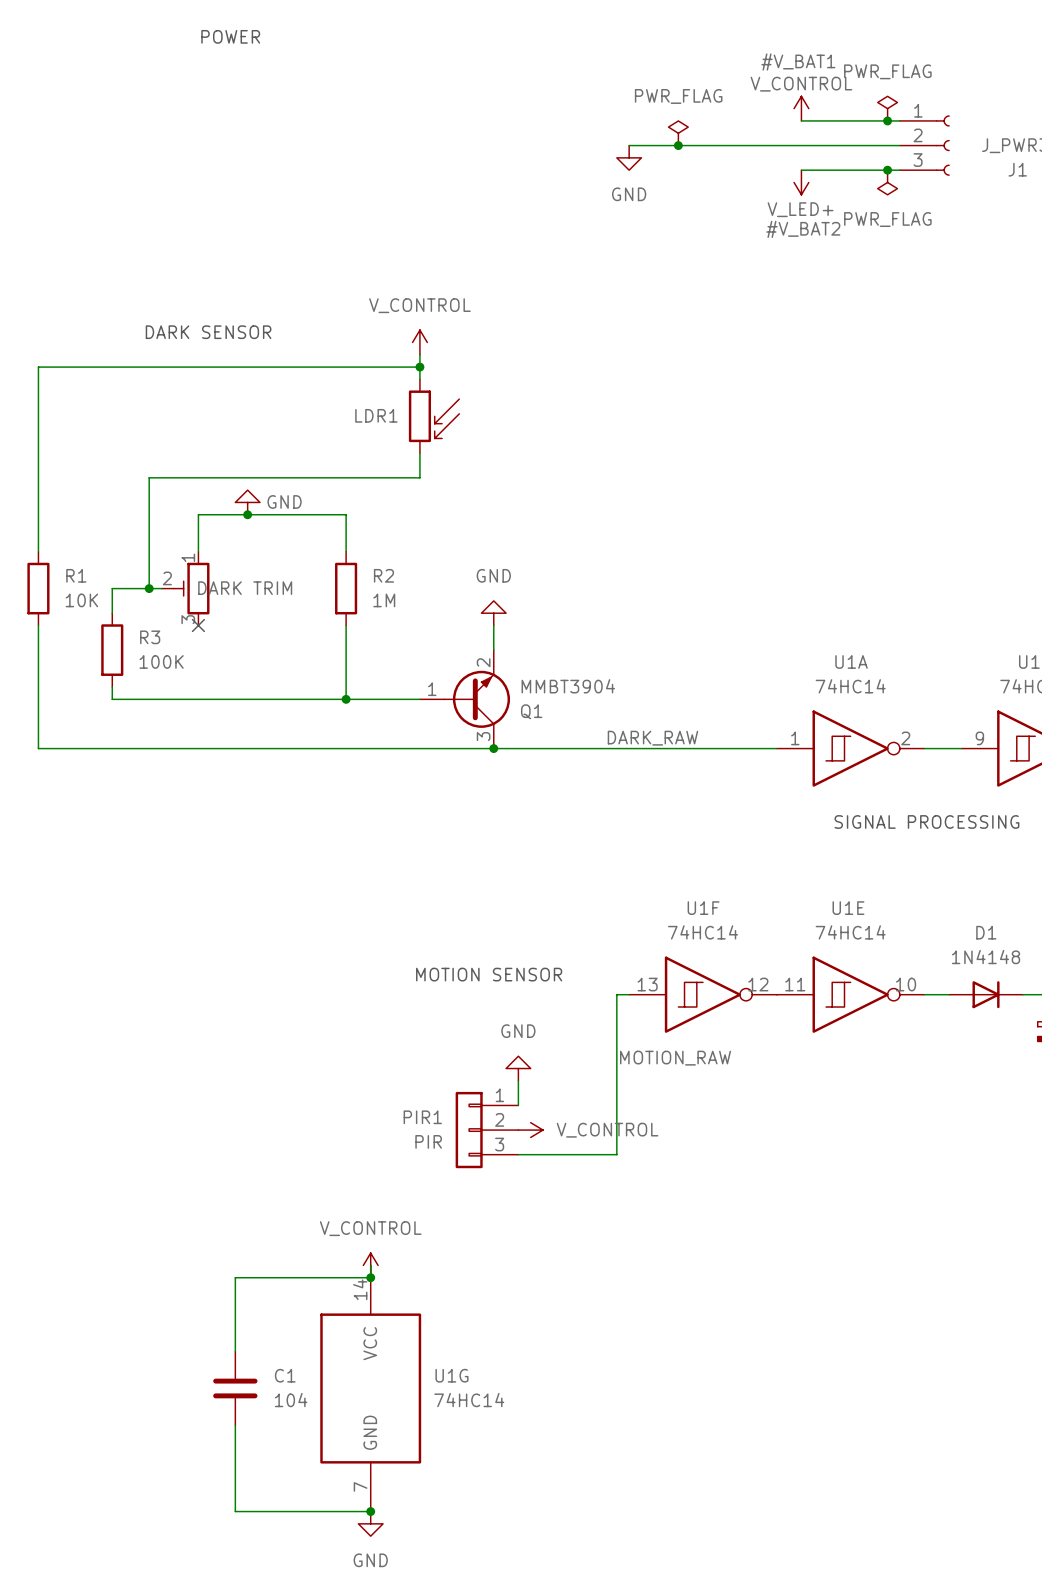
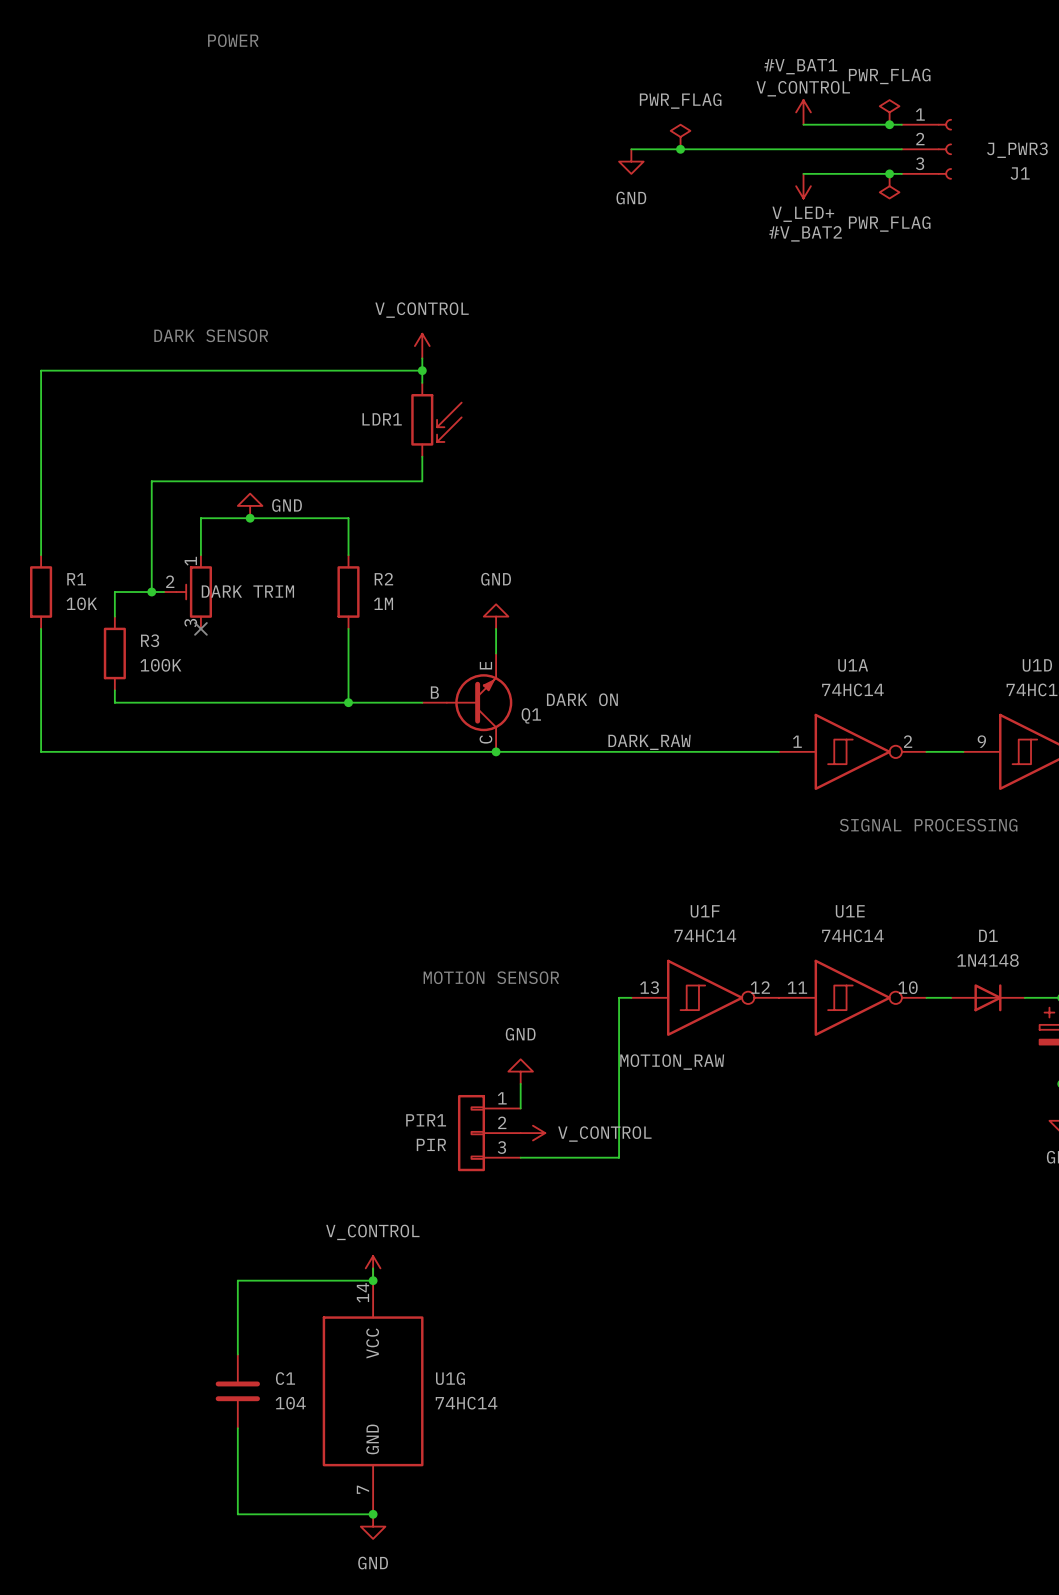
Q1 pin name: none -> E (485, 665)
Q1 pin number: 2 (483, 662) -> none
Q1 value: MMBT3904 (568, 686) -> DARK ON (582, 699)
Q1 pin name: none -> B (434, 692)
Q1 pin number: 1 (432, 689) -> none
Q1 pin name: none -> C (485, 739)
Q1 pin number: 3 (483, 736) -> none

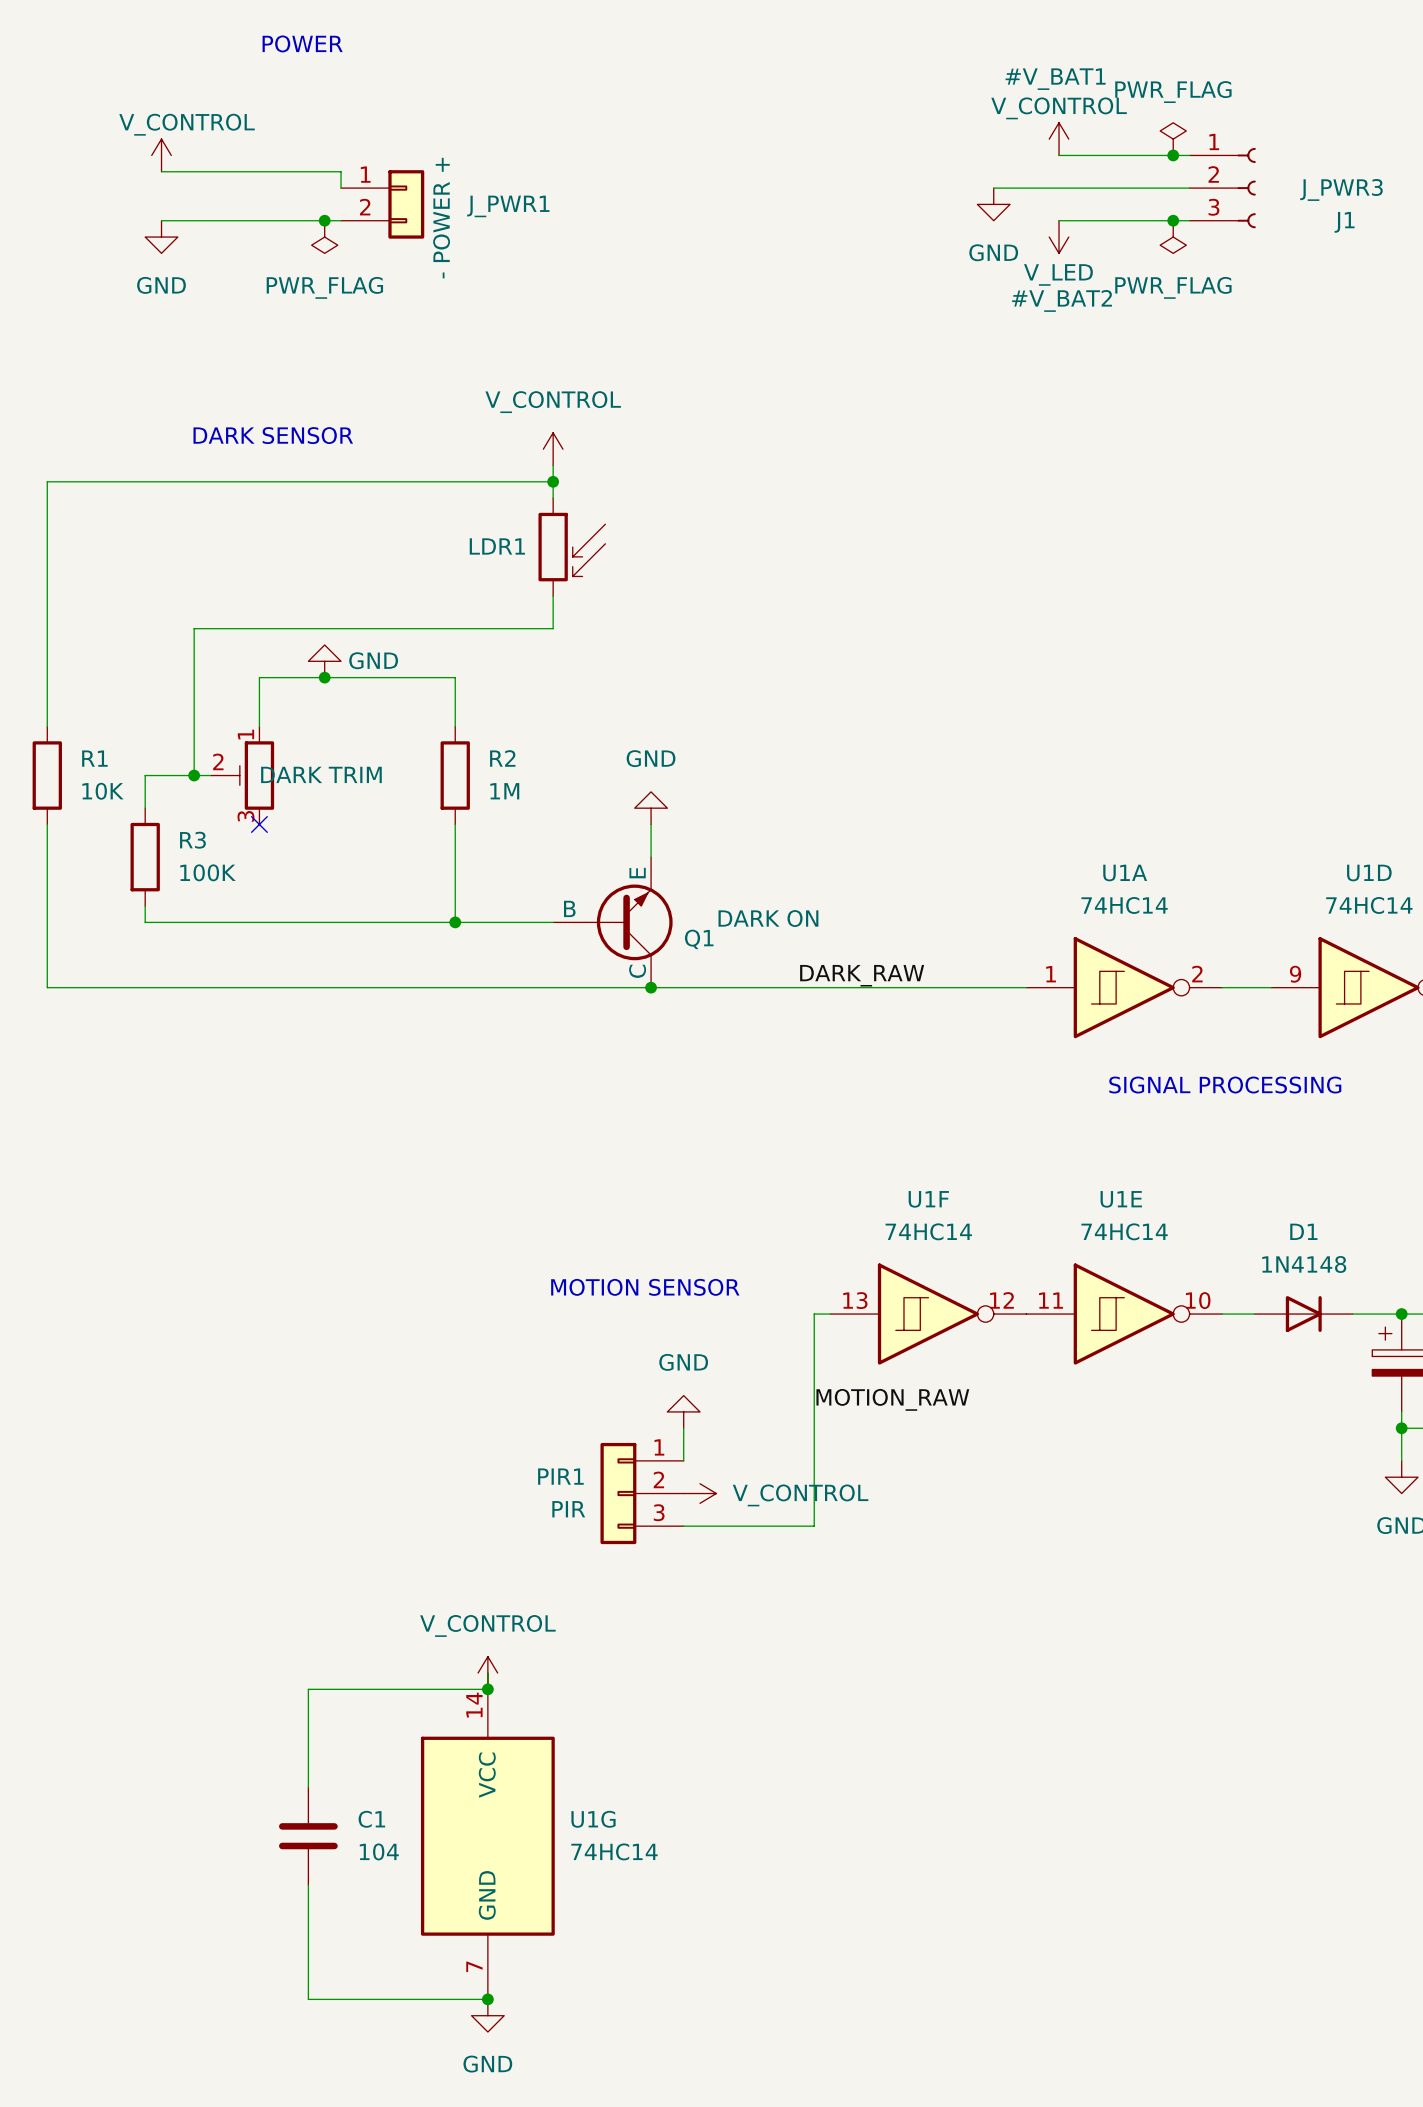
power symbol: none -> V_CONTROL (161, 155)
wire: none -> (161, 171) (341, 171) (341, 188)
power symbol: PWR_FLAG (680, 137) -> none
wire: (631, 149) (754, 149) -> none
junction: (680, 149) -> none
J_PWR1: none -> - POWER + (382, 204)
power symbol position: GND (631, 161) -> GND (993, 204)
wire: none -> (161, 220) (341, 220)
junction: none -> (324, 220)
power symbol: none -> GND (161, 237)
power symbol: none -> PWR_FLAG (324, 237)
power symbol: V_LED+ (803, 186) -> V_LED (1059, 237)

